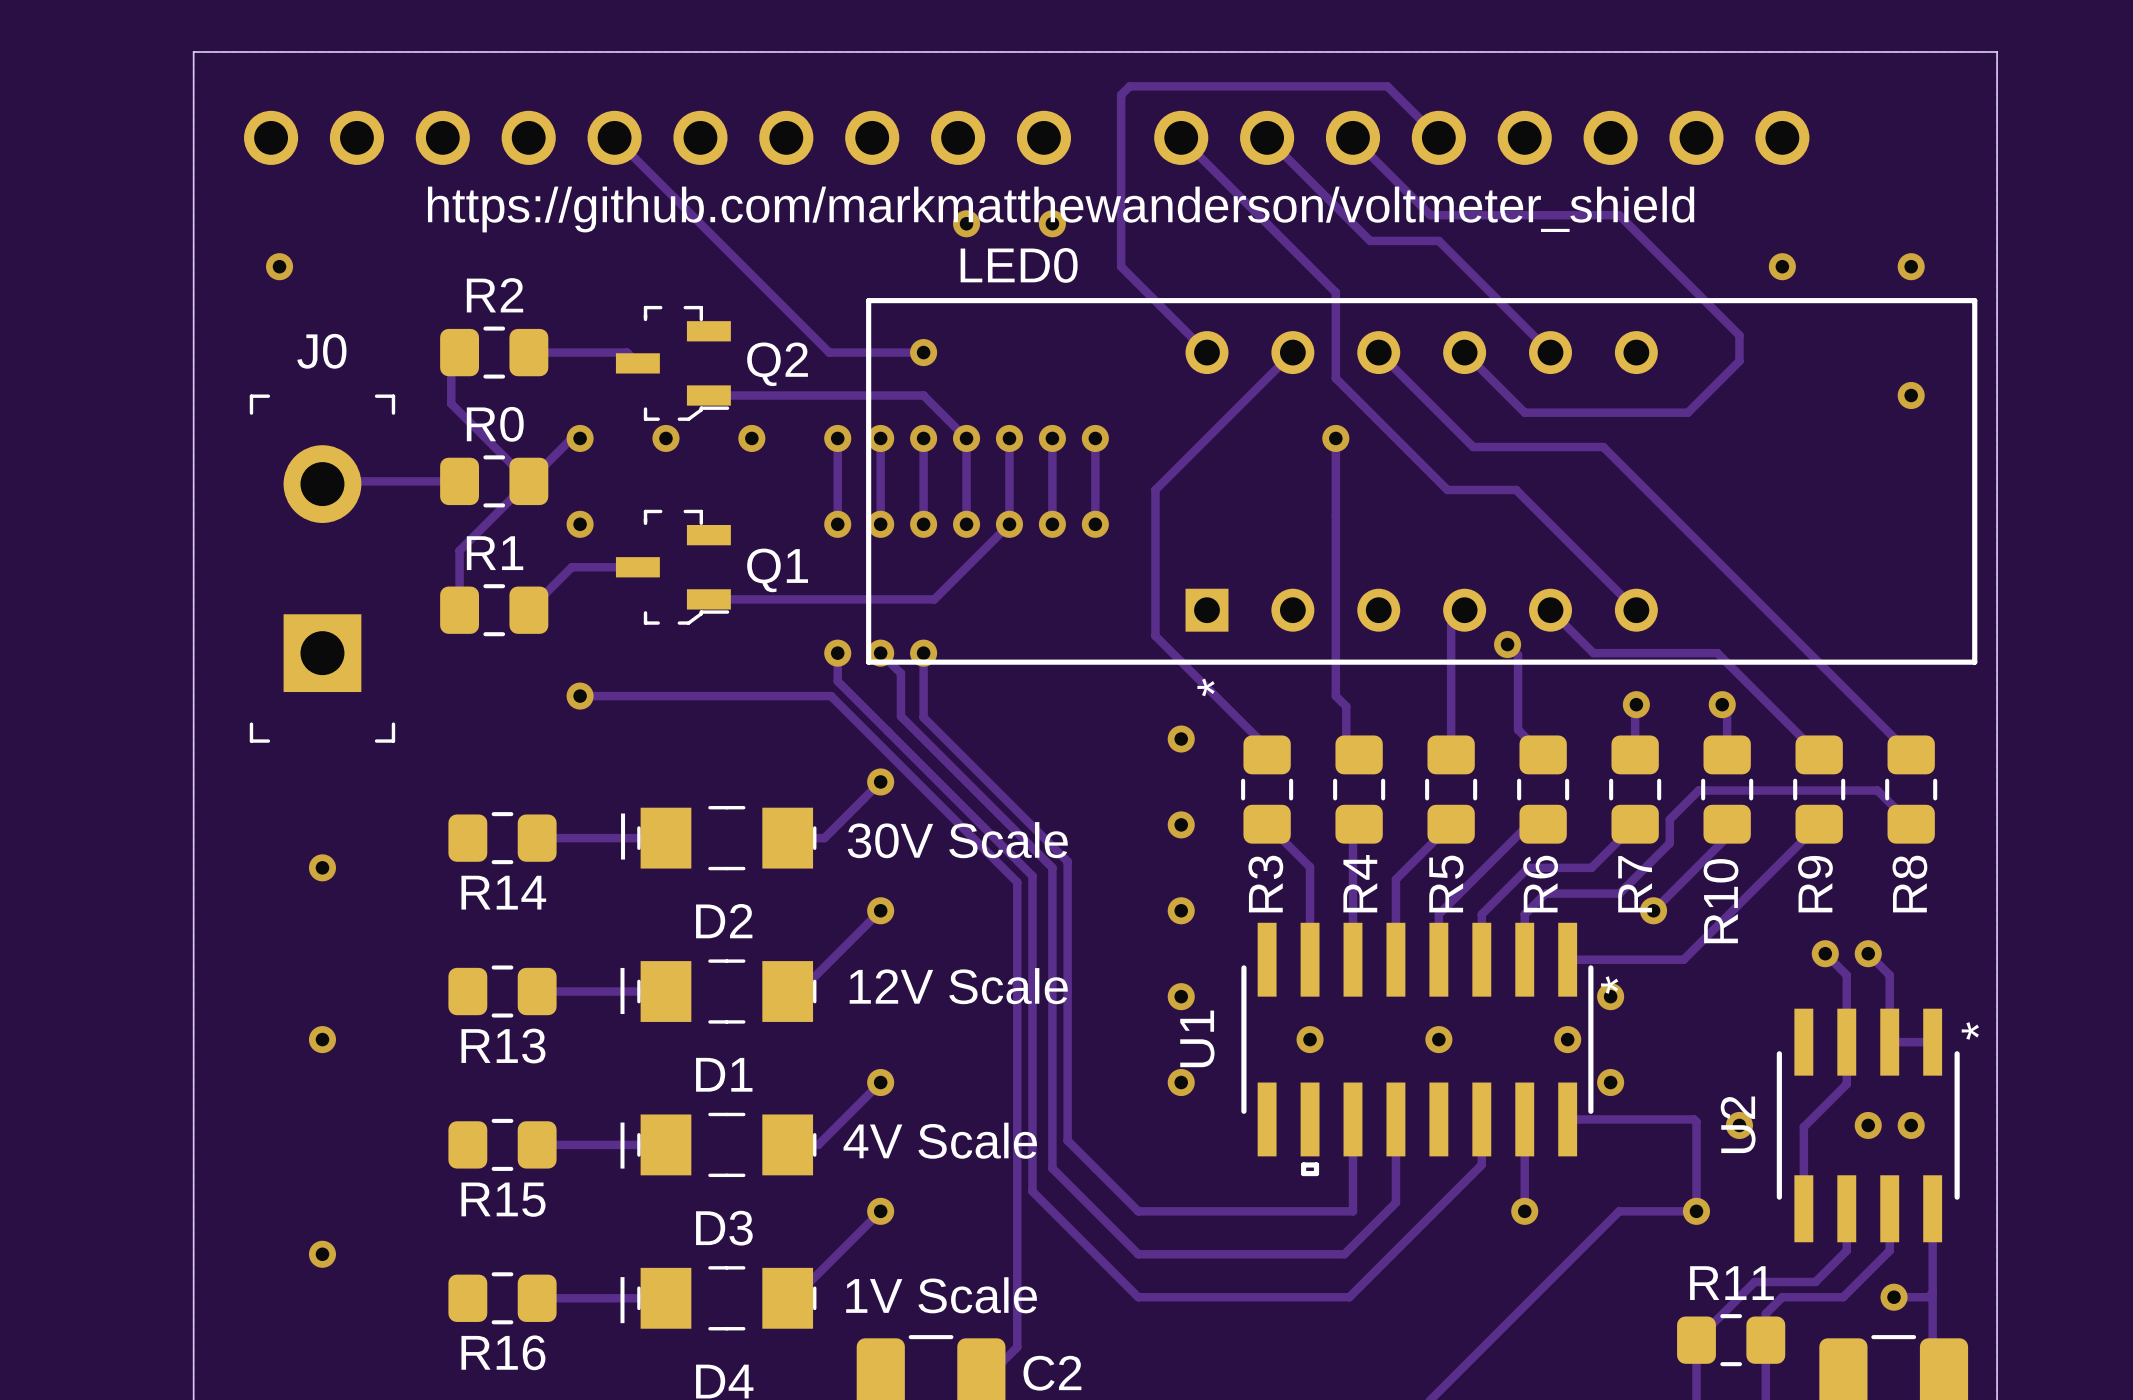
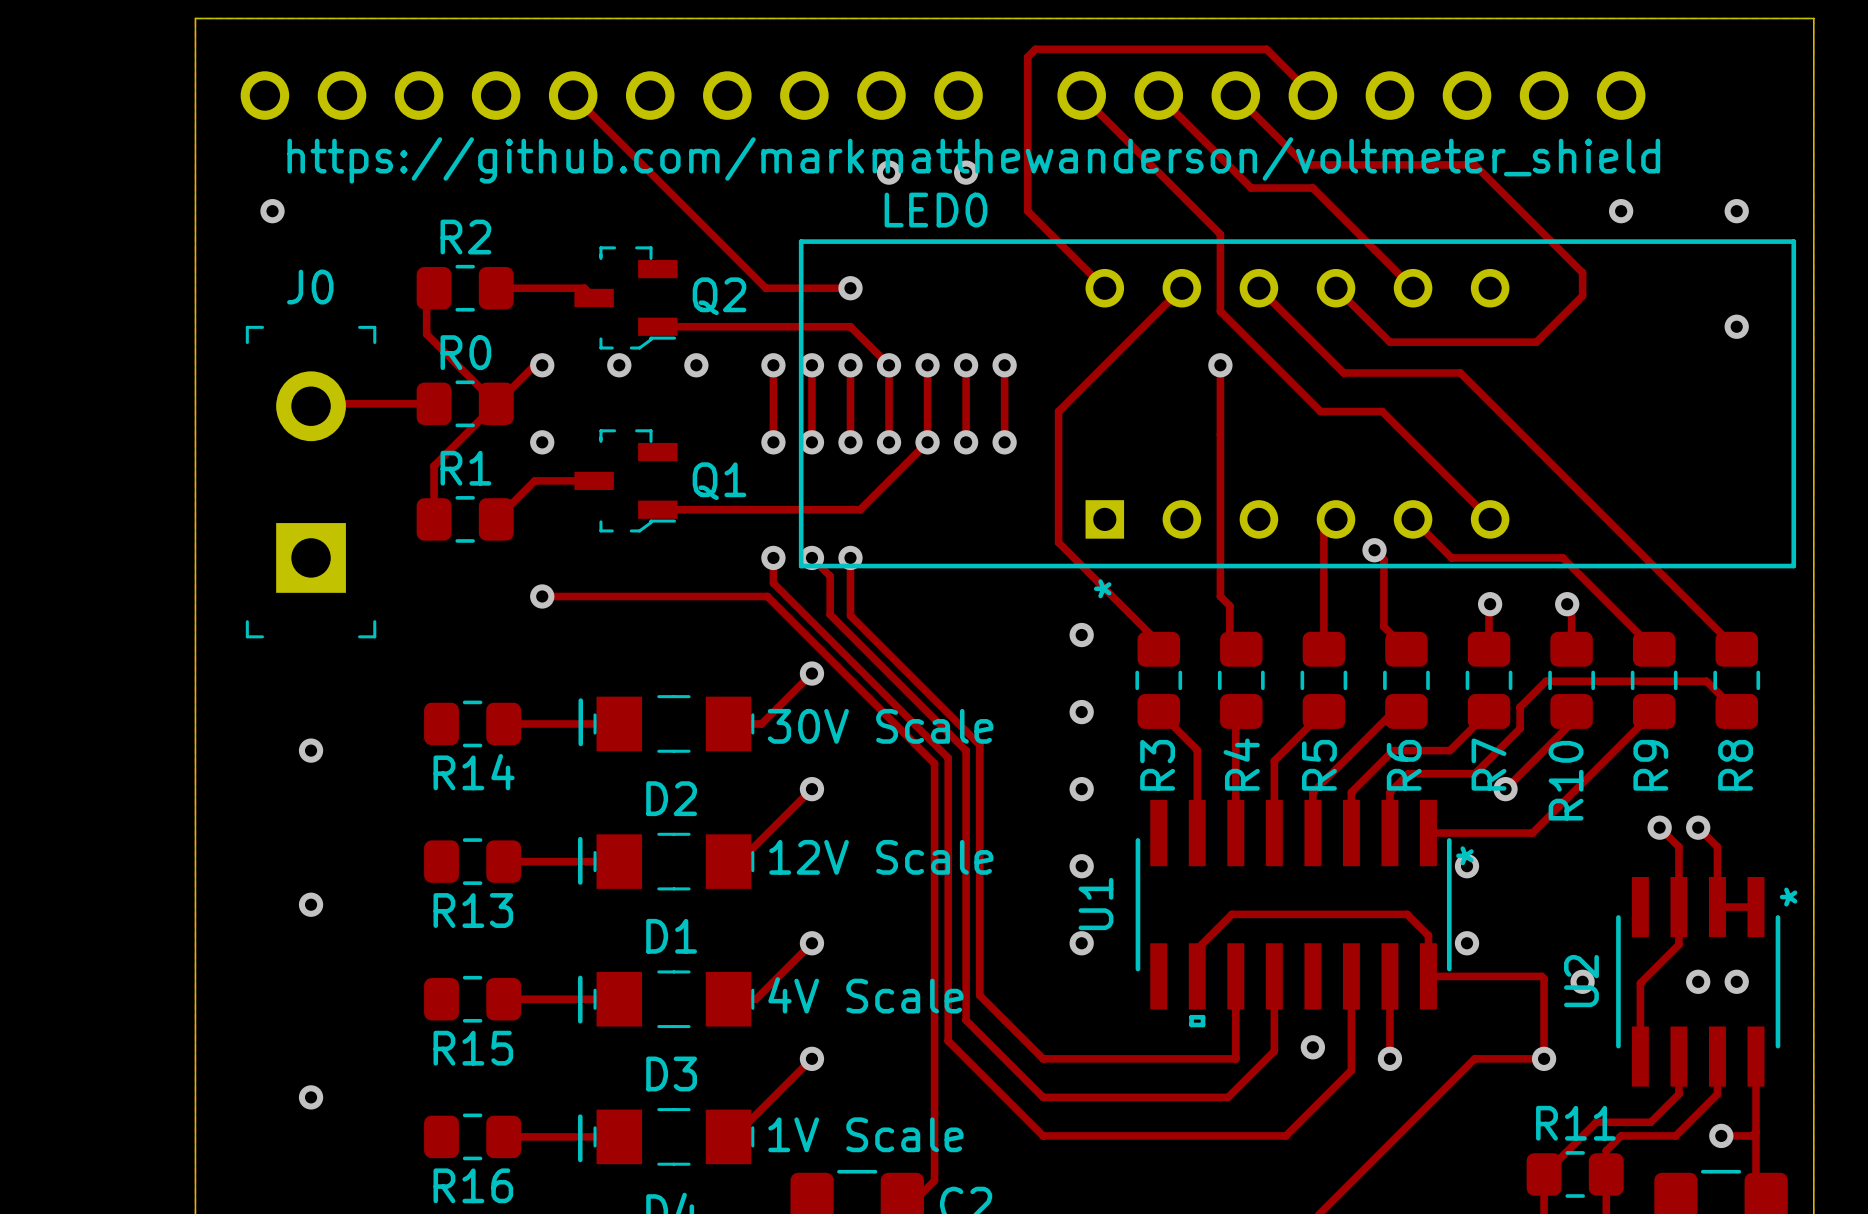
via: (1310, 1039) -> none
via: (1438, 1039) -> none
via: (1567, 1039) -> none
track: none -> (1197, 976) (1197, 949) (1231, 914) (1407, 914) (1428, 935) (1428, 976)
track: (1481, 1164) (1349, 1297) -> (1351, 1017) (1351, 1070) (1285, 1135) (1232, 1135)
via: none -> (1312, 1047)

